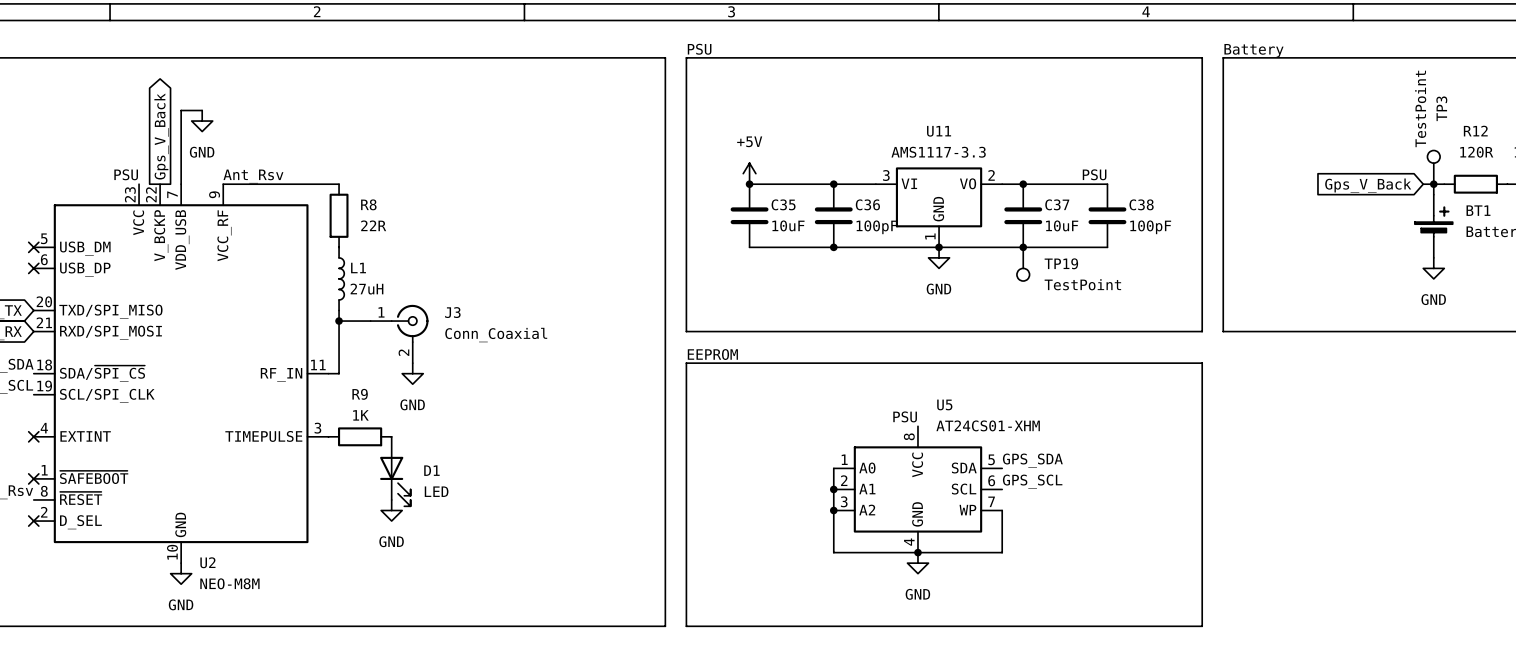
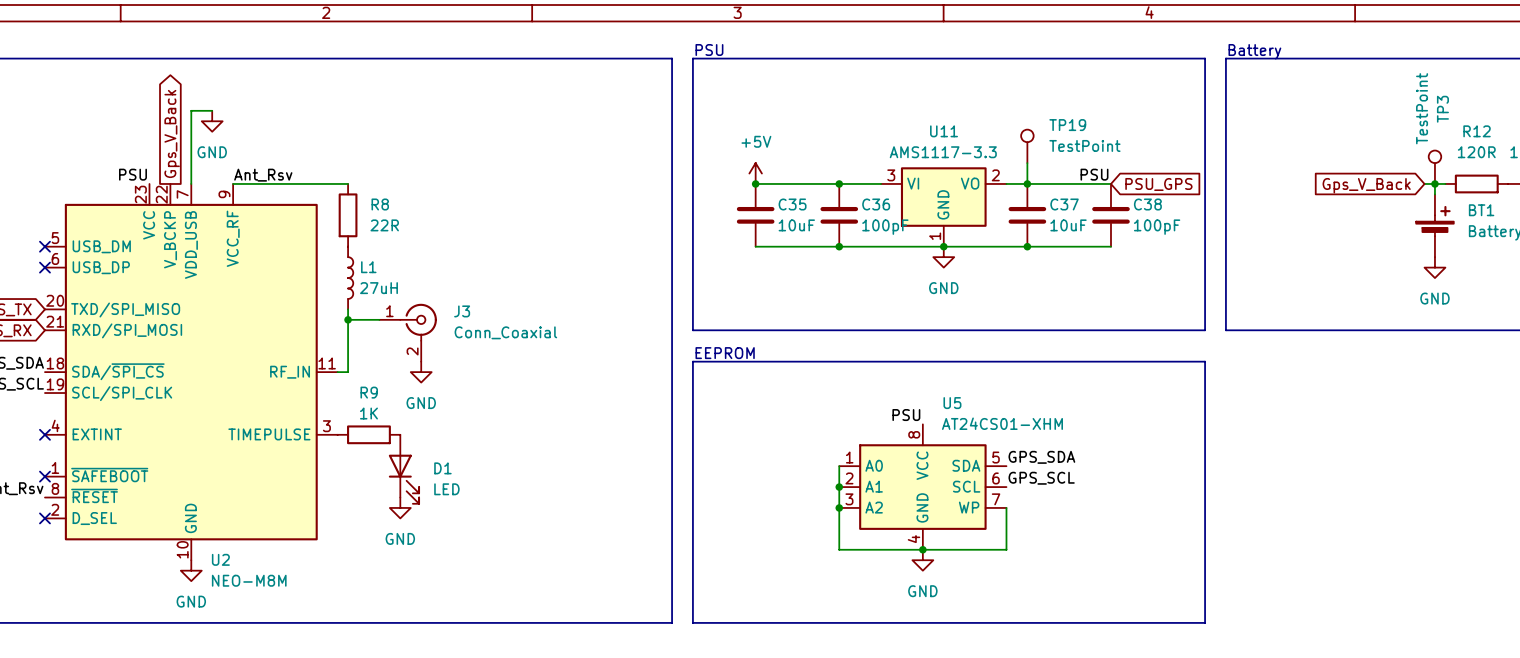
wire: none -> (1027, 163) (1027, 183)
global label: none -> PSU_GPS (1158, 184)
TP19 name position: TP19 (1061, 263) -> TP19 (1067, 125)
TP19 position: (1023, 264) -> (1027, 146)
TP19 rotation: 0° (1023, 274) -> 180° (1027, 135)
TP19 value position: TestPoint (1082, 284) -> TestPoint (1084, 145)

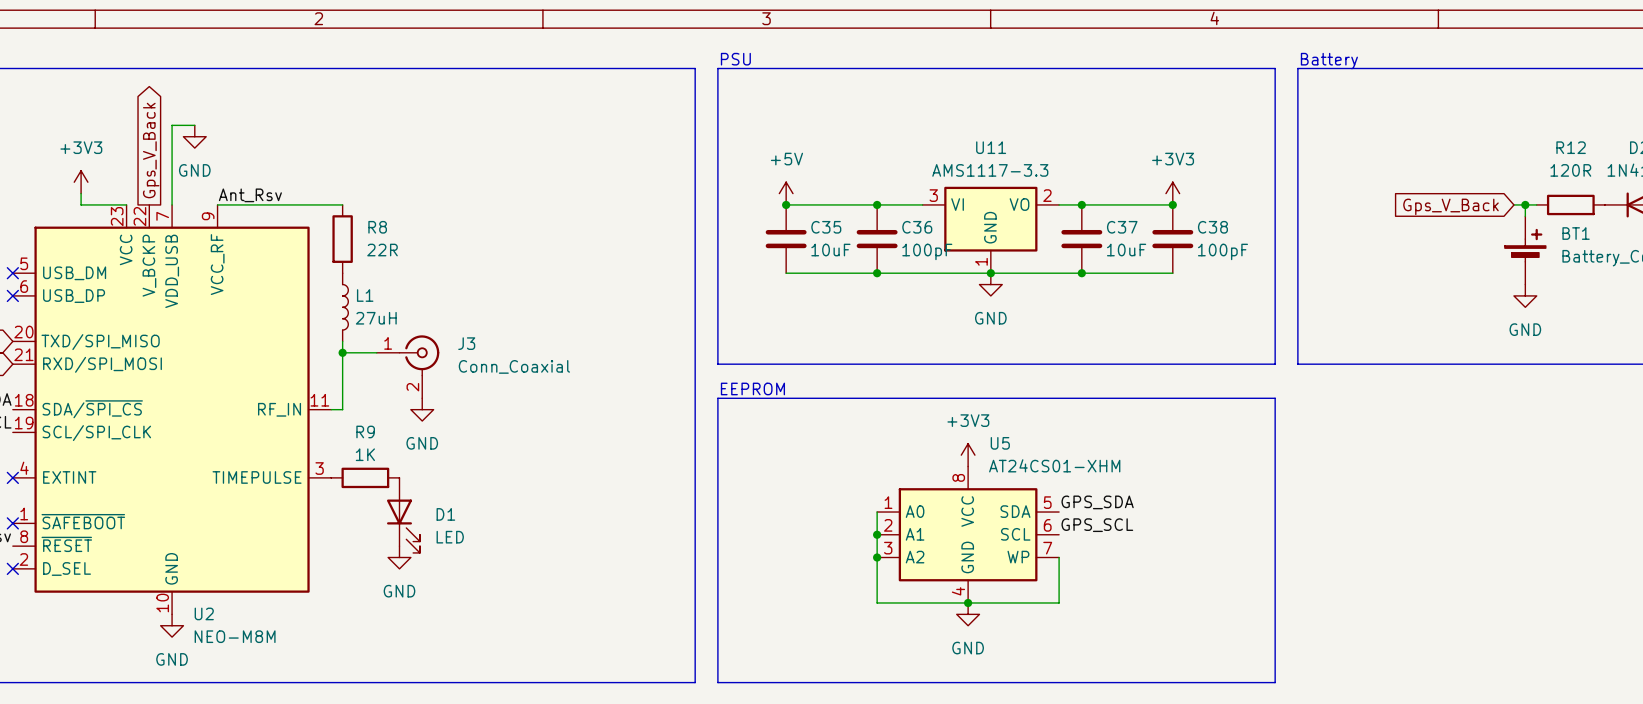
TP19: TestPoint (1027, 146) -> none
power symbol: none -> +3V3 (81, 182)
wire: (1027, 163) (1027, 183) -> none
TP3: TestPoint (1434, 167) -> none
wire: none -> (81, 193) (81, 204) (126, 204)
power symbol: none -> +3V3 (1172, 193)
label: PSU (132, 174) -> none
label: PSU (1094, 174) -> none
junction: none -> (1172, 204)
global label: PSU_GPS (1158, 184) -> none
power symbol: none -> +3V3 (968, 455)
label: PSU (906, 415) -> none

